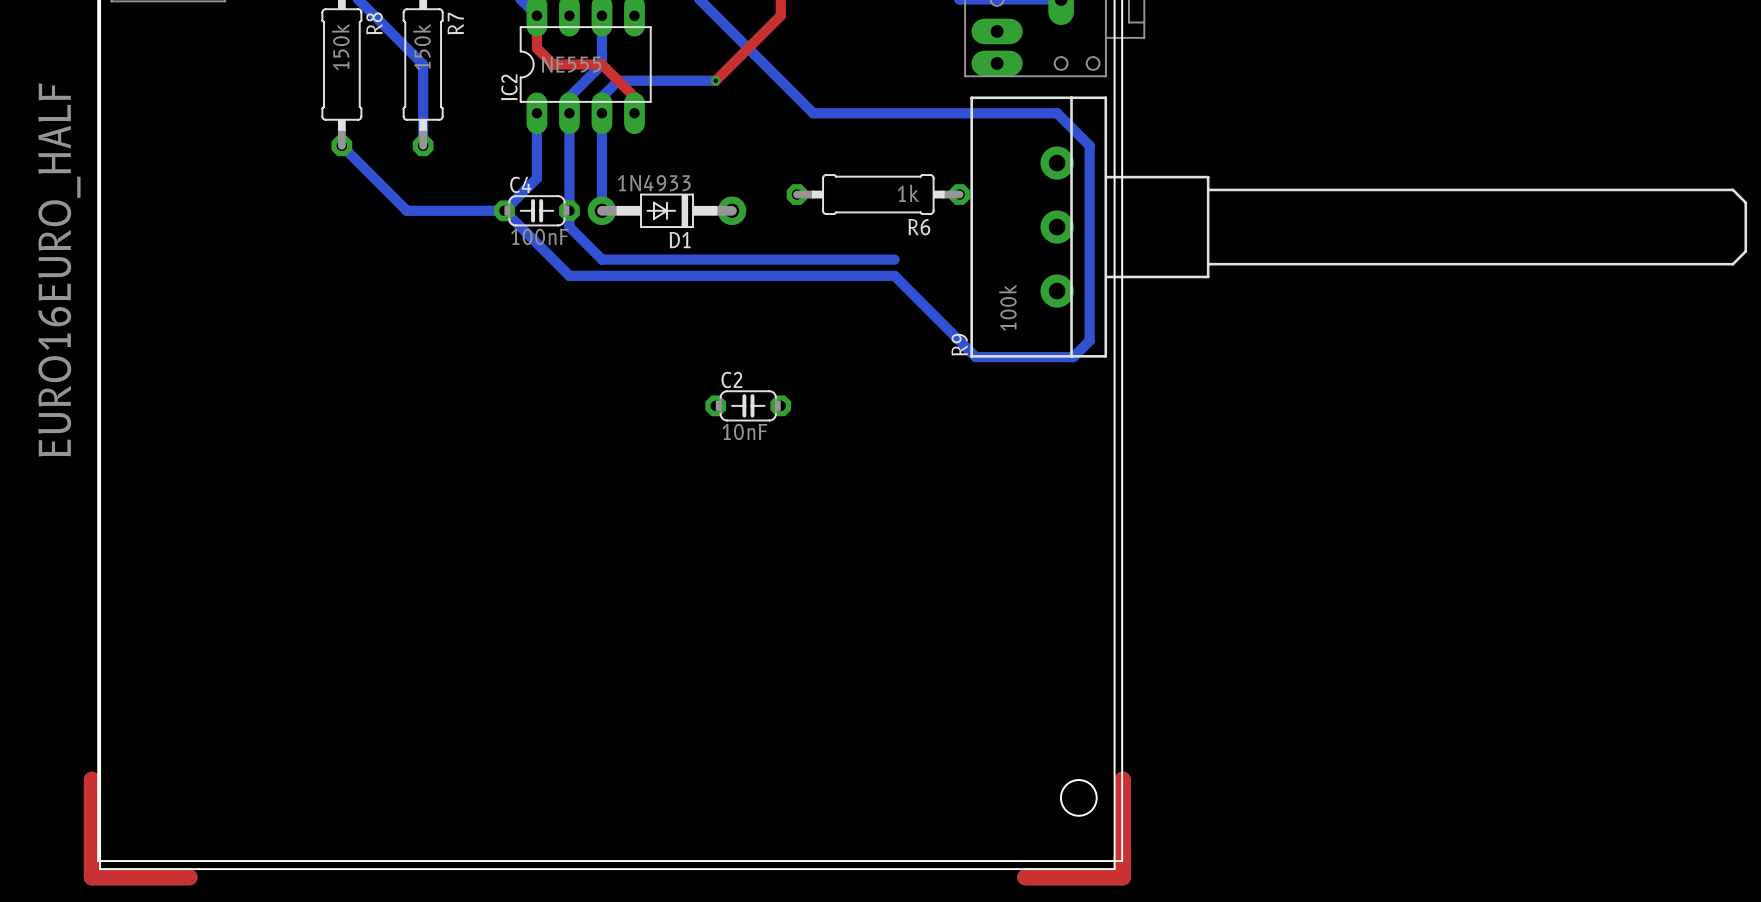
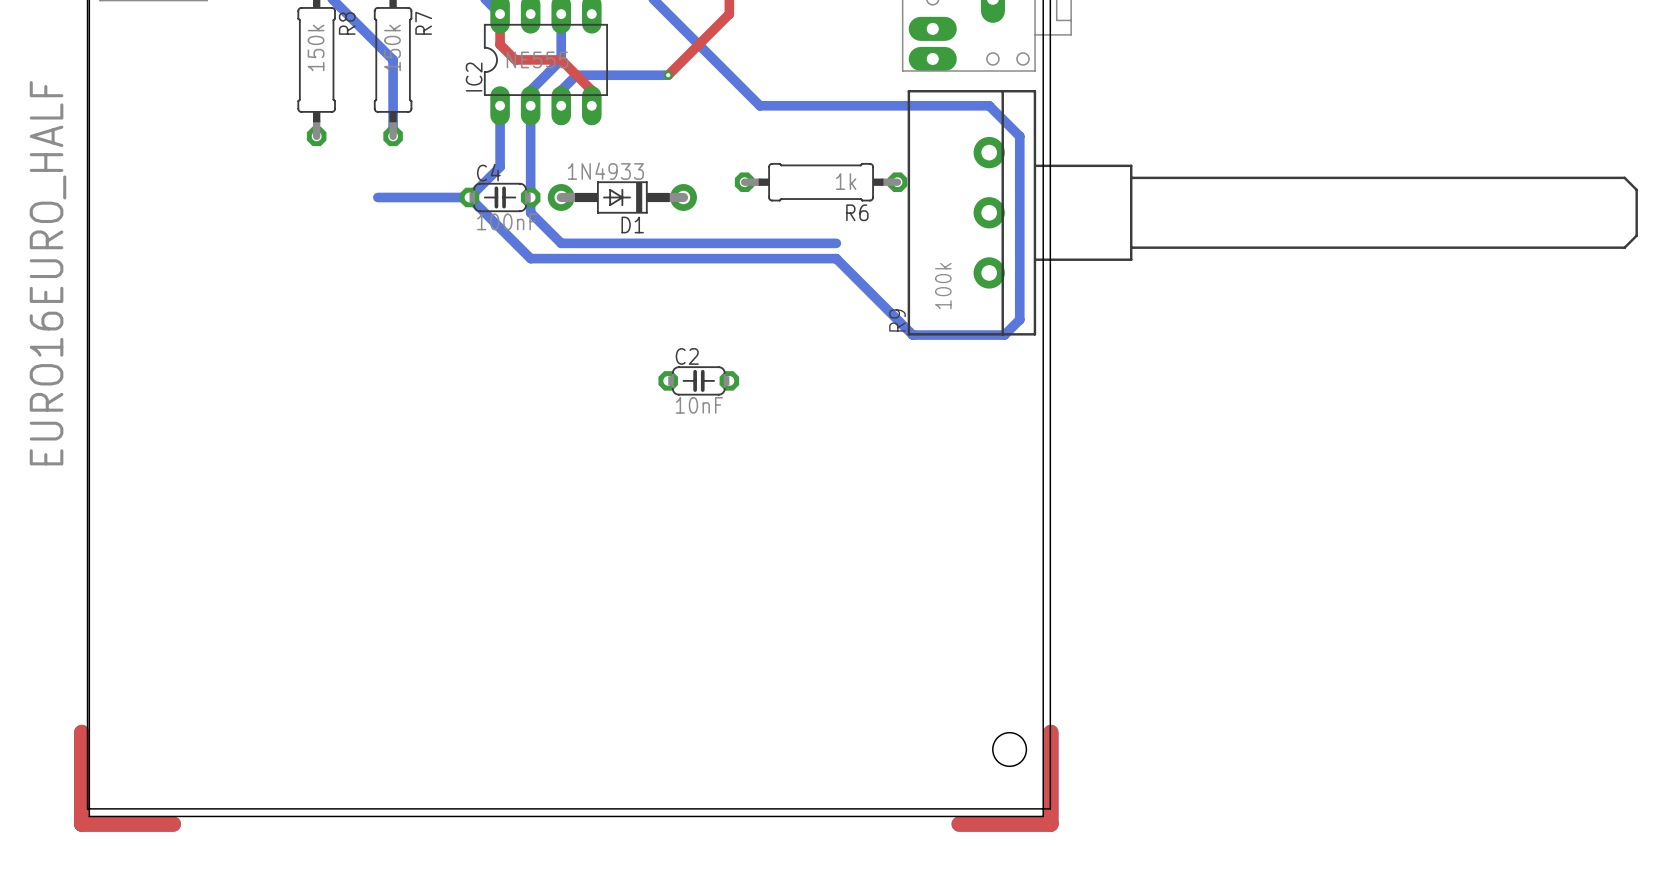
bottom track: (601, 113) (601, 210) -> none
bottom track: (341, 145) (406, 210) -> none

